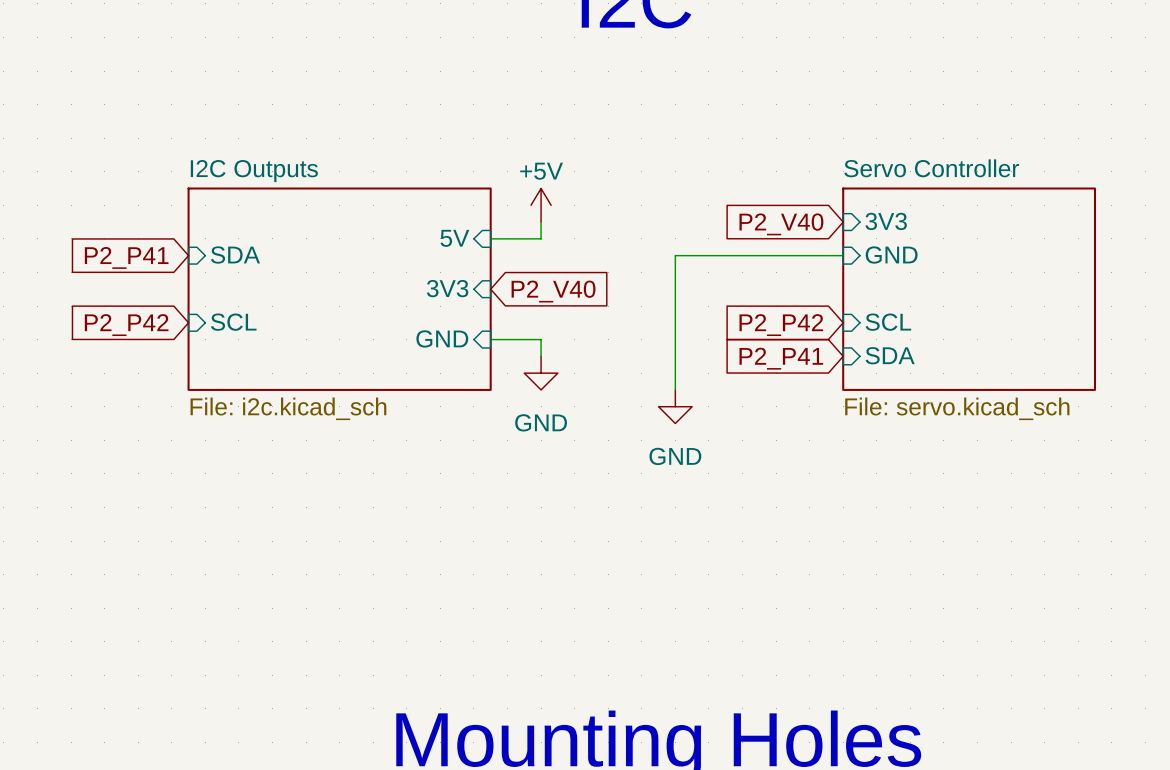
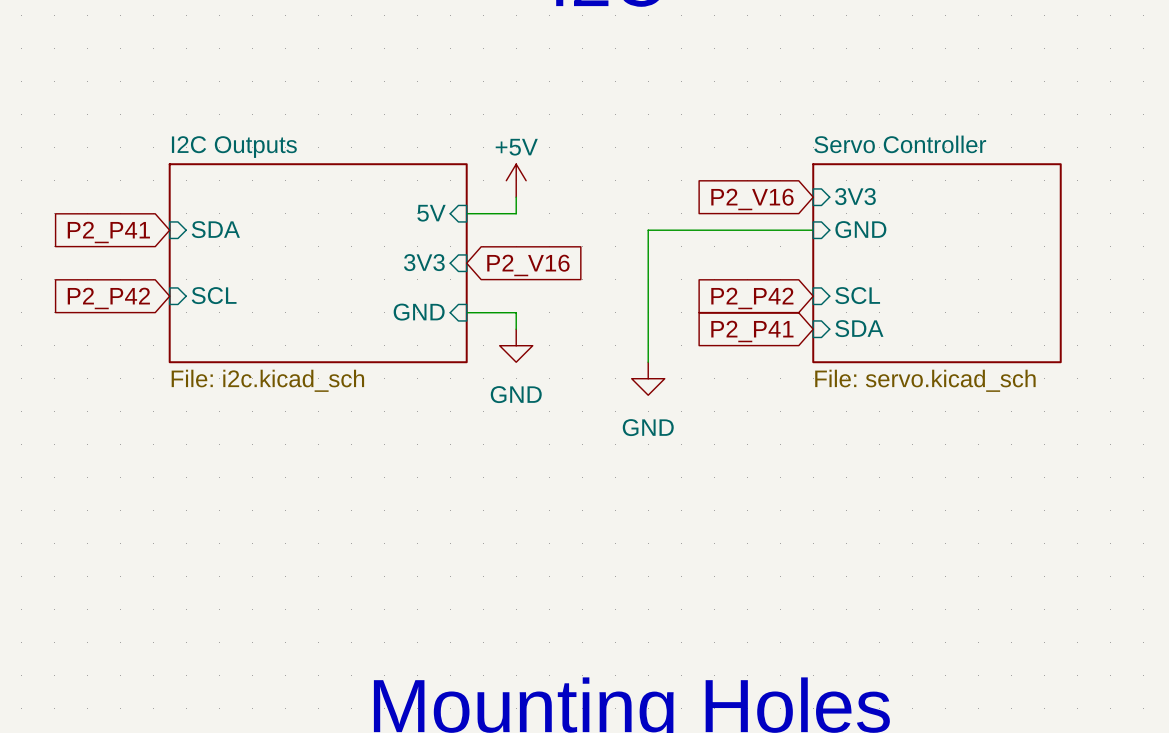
global label: P2_V40 (781, 224) -> P2_V16 (752, 199)
global label: P2_V40 (553, 291) -> P2_V16 (528, 265)

